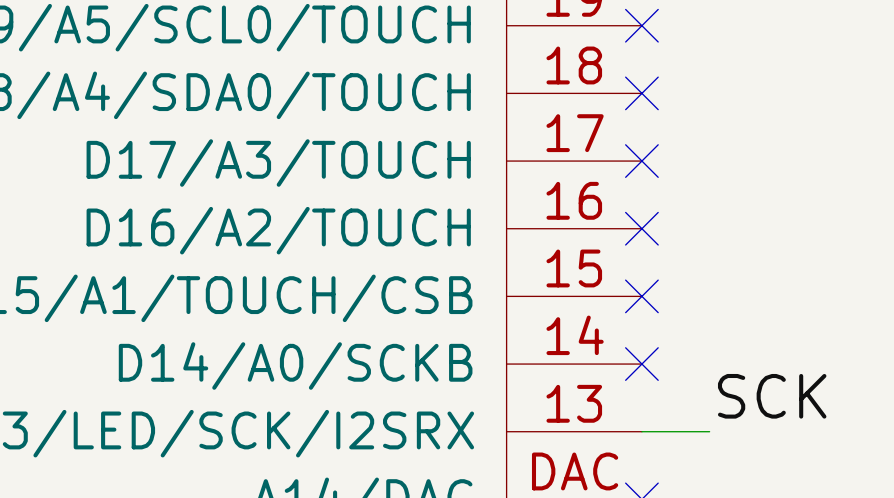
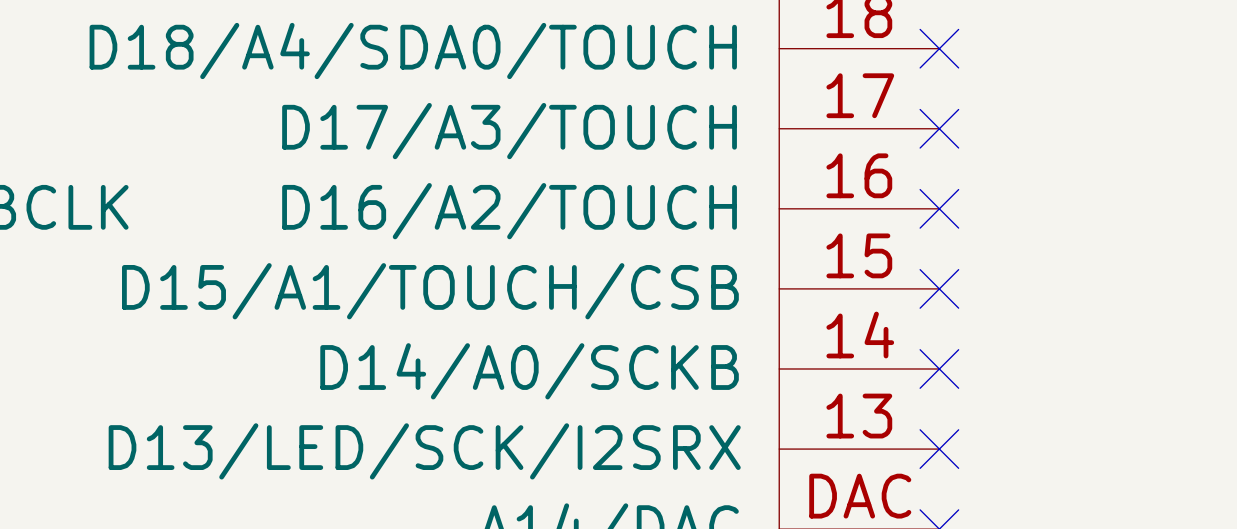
label: SCK (772, 396) -> none
wire: (641, 431) (709, 431) -> none
no-connect mark: none -> (939, 449)

